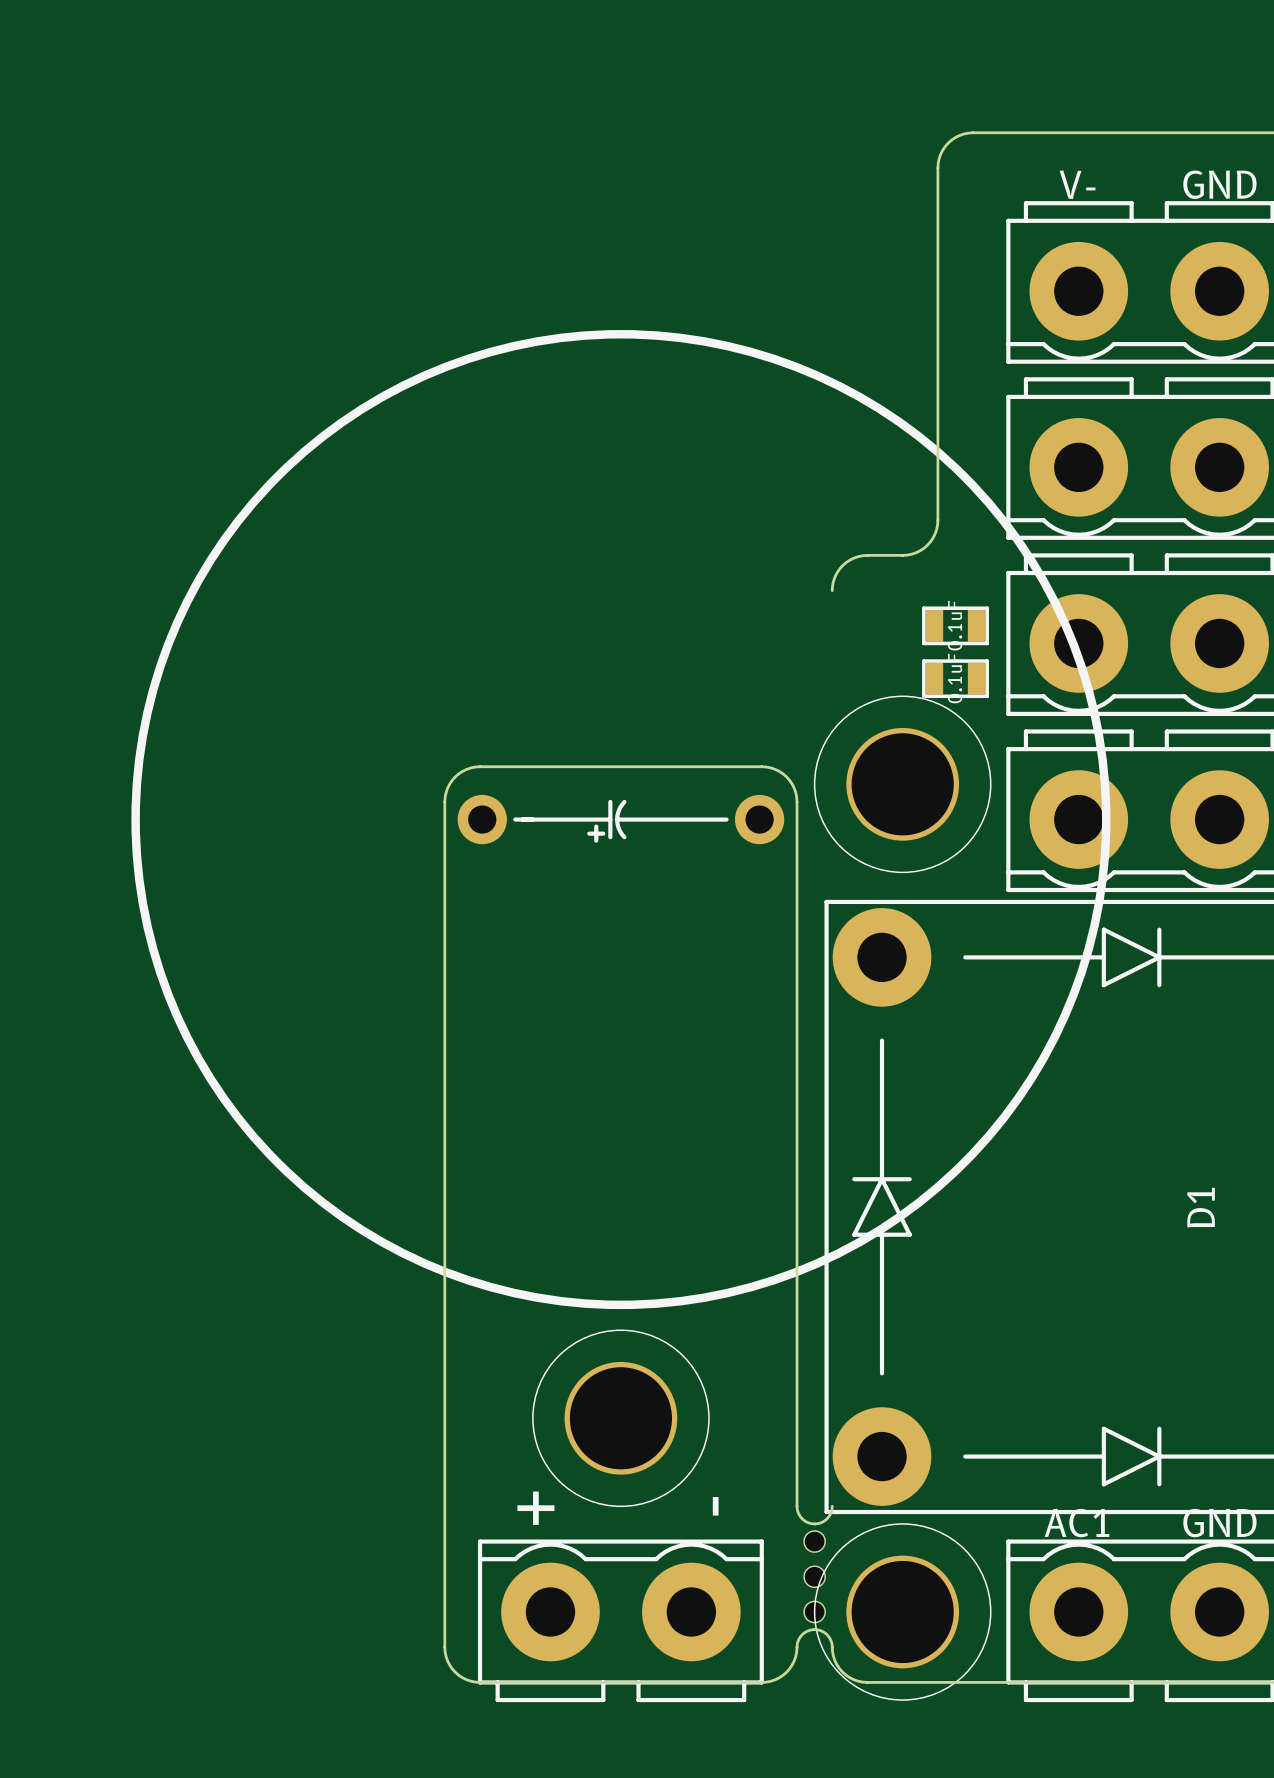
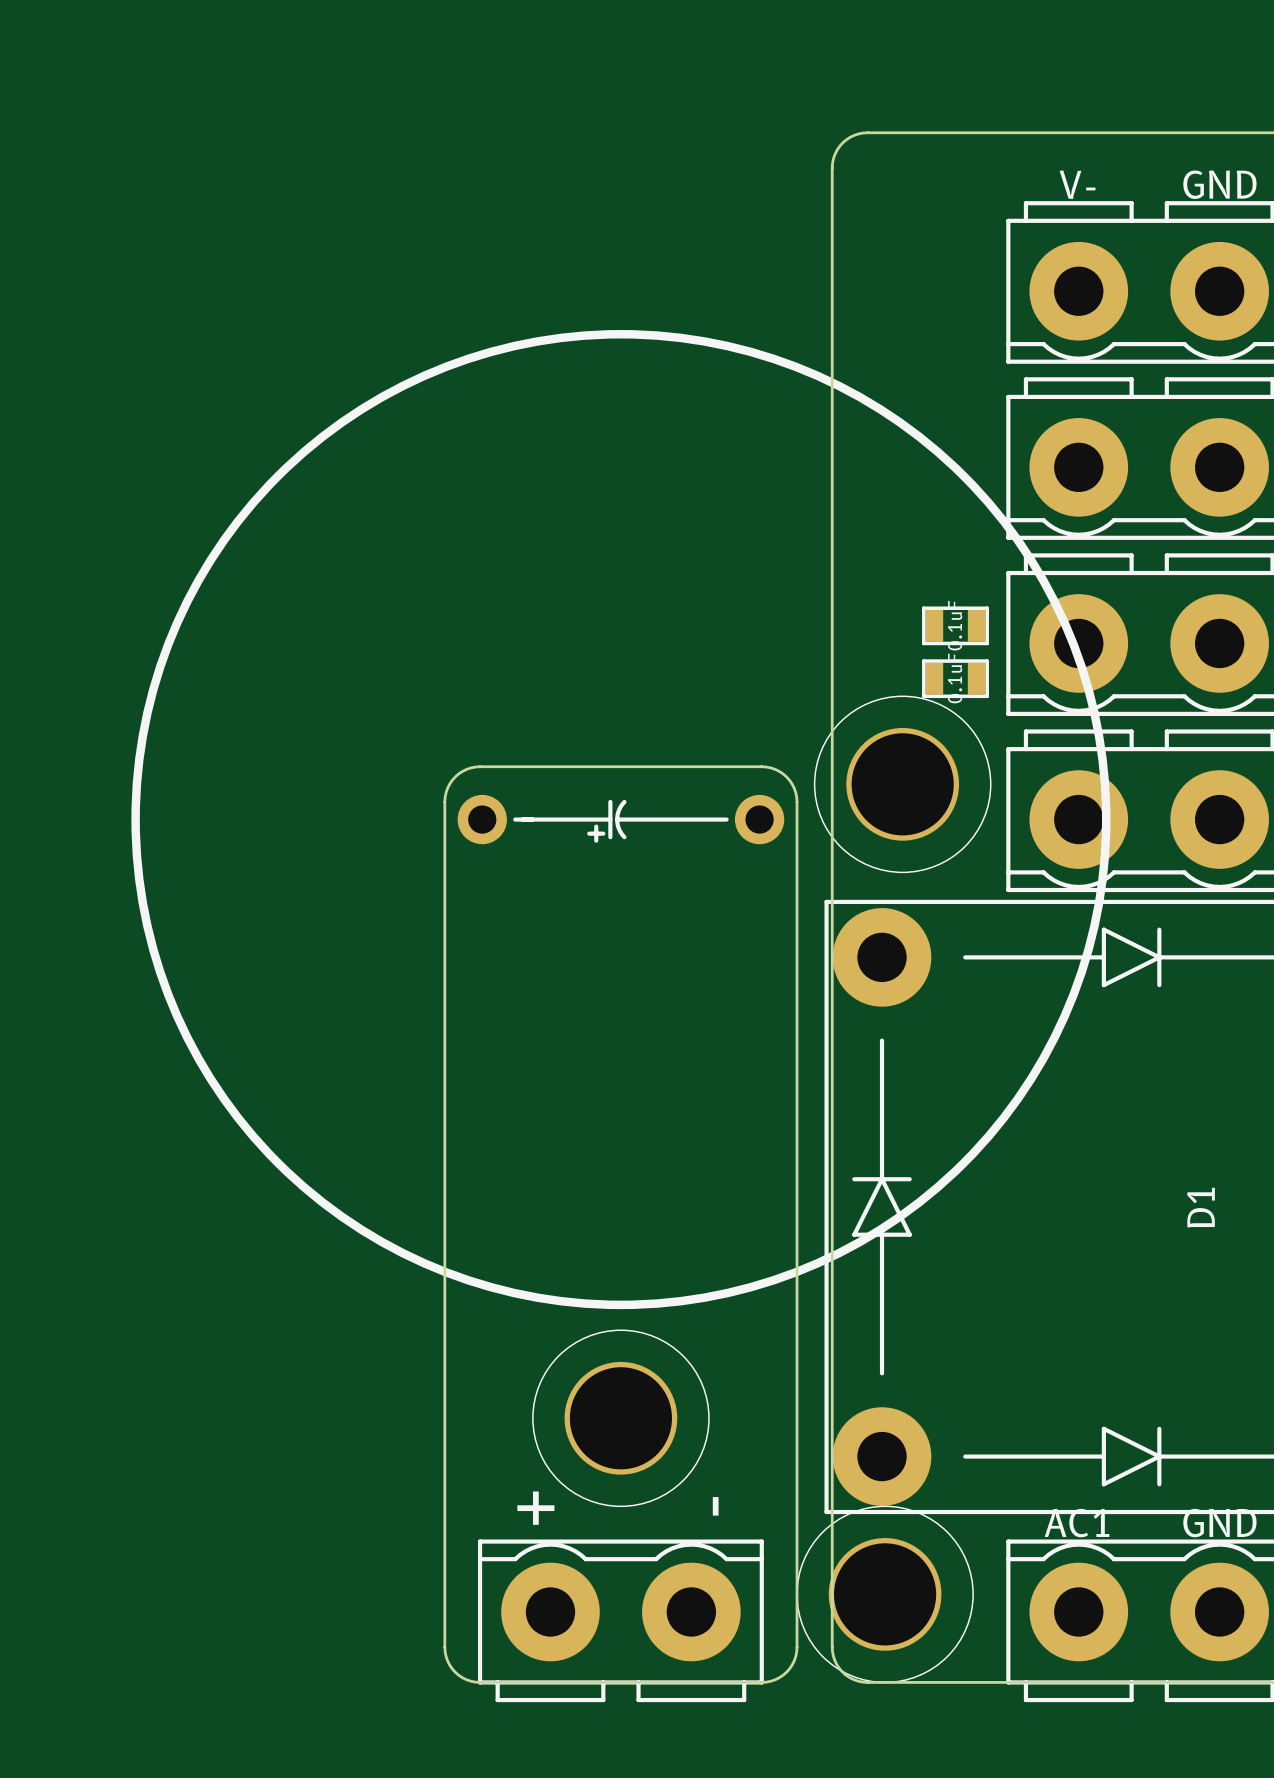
board edge: (973, 132) (964, 133) (951, 140) (942, 150) (938, 163) (936, 529) (927, 545) (916, 552) (902, 555) (862, 555) (849, 560) (836, 573) (832, 590) -> (973, 132) (858, 133) (842, 143) (834, 154) (832, 163) (832, 1647)
board edge: (797, 1506) (802, 1518) (814, 1523) -> (797, 1506) (797, 1647)
board edge: (832, 1506) (827, 1518) (814, 1523) -> none
part: (814, 1576) -> none
part position: (902, 1611) -> (885, 1594)
board edge: (797, 1647) (802, 1634) (814, 1629) (827, 1634) (832, 1647) -> none

